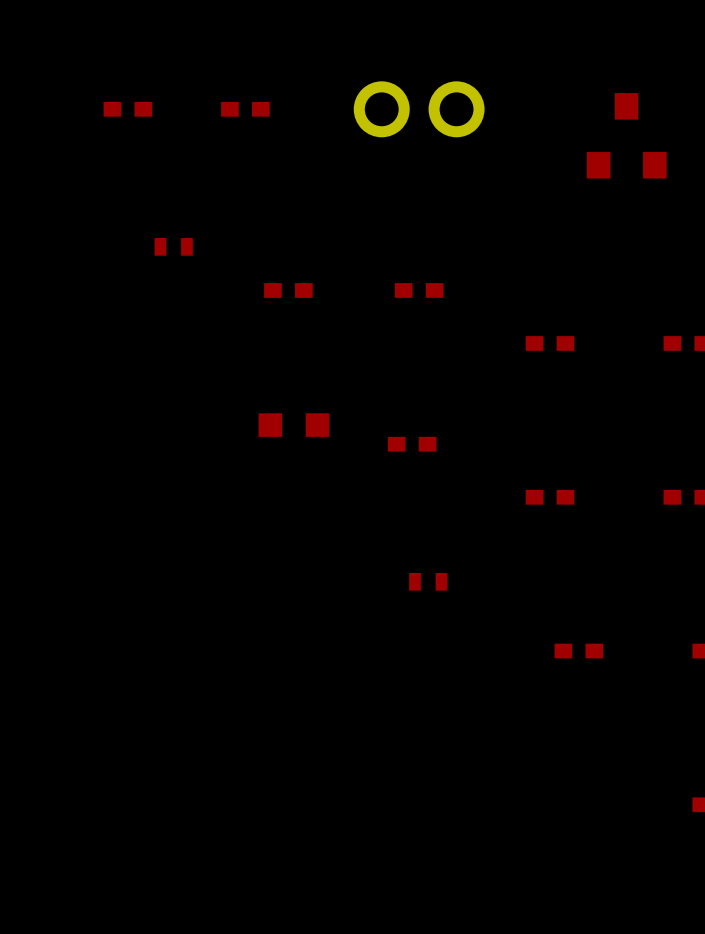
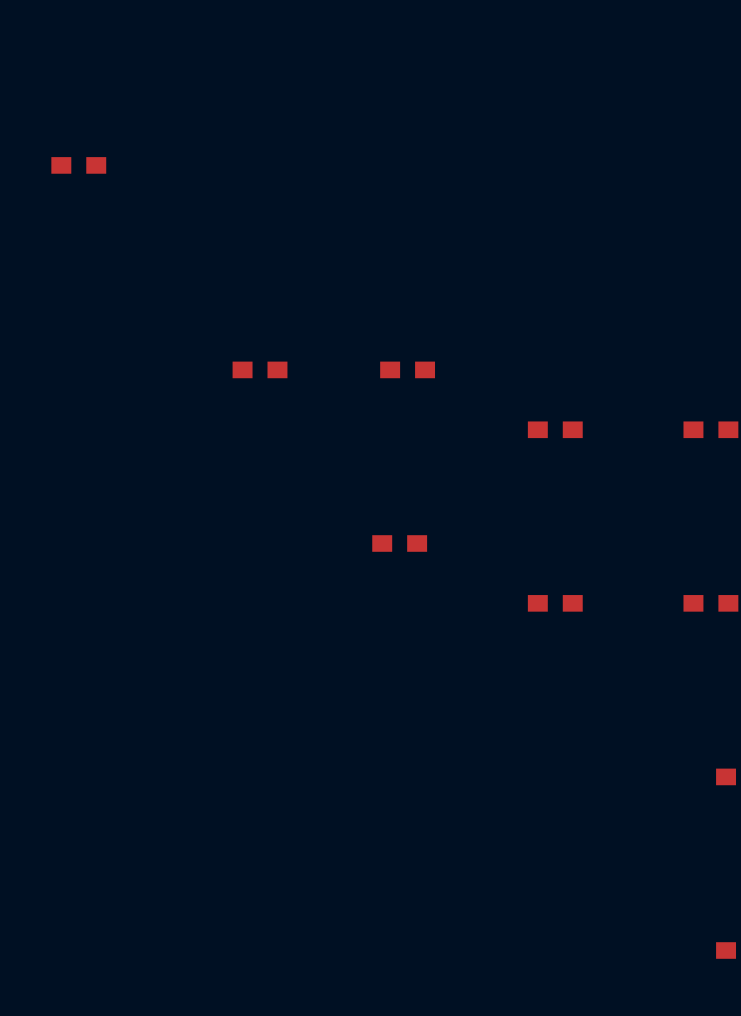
part: (245, 109) -> none
part: (419, 109) -> none
part: (626, 135) -> none
part: (173, 246) -> none
part: (293, 425) -> none
part: (428, 581) -> none
part: (578, 651) -> none

